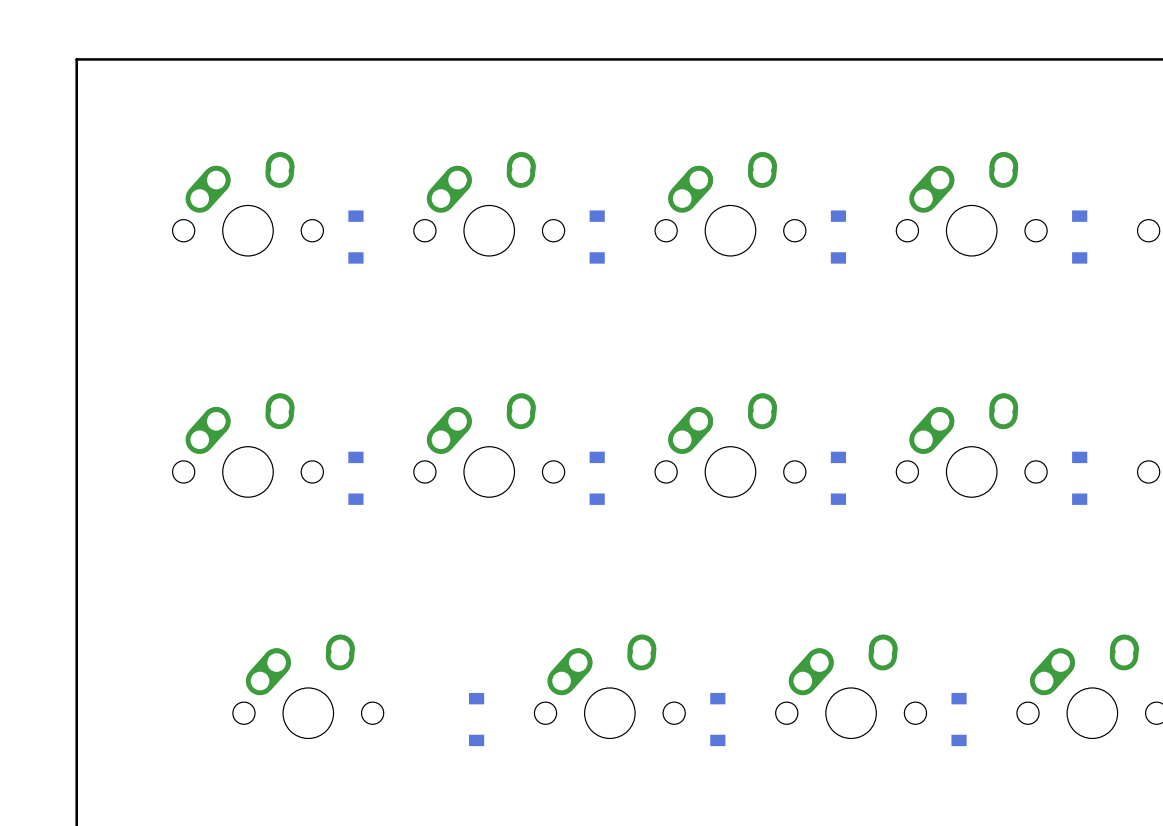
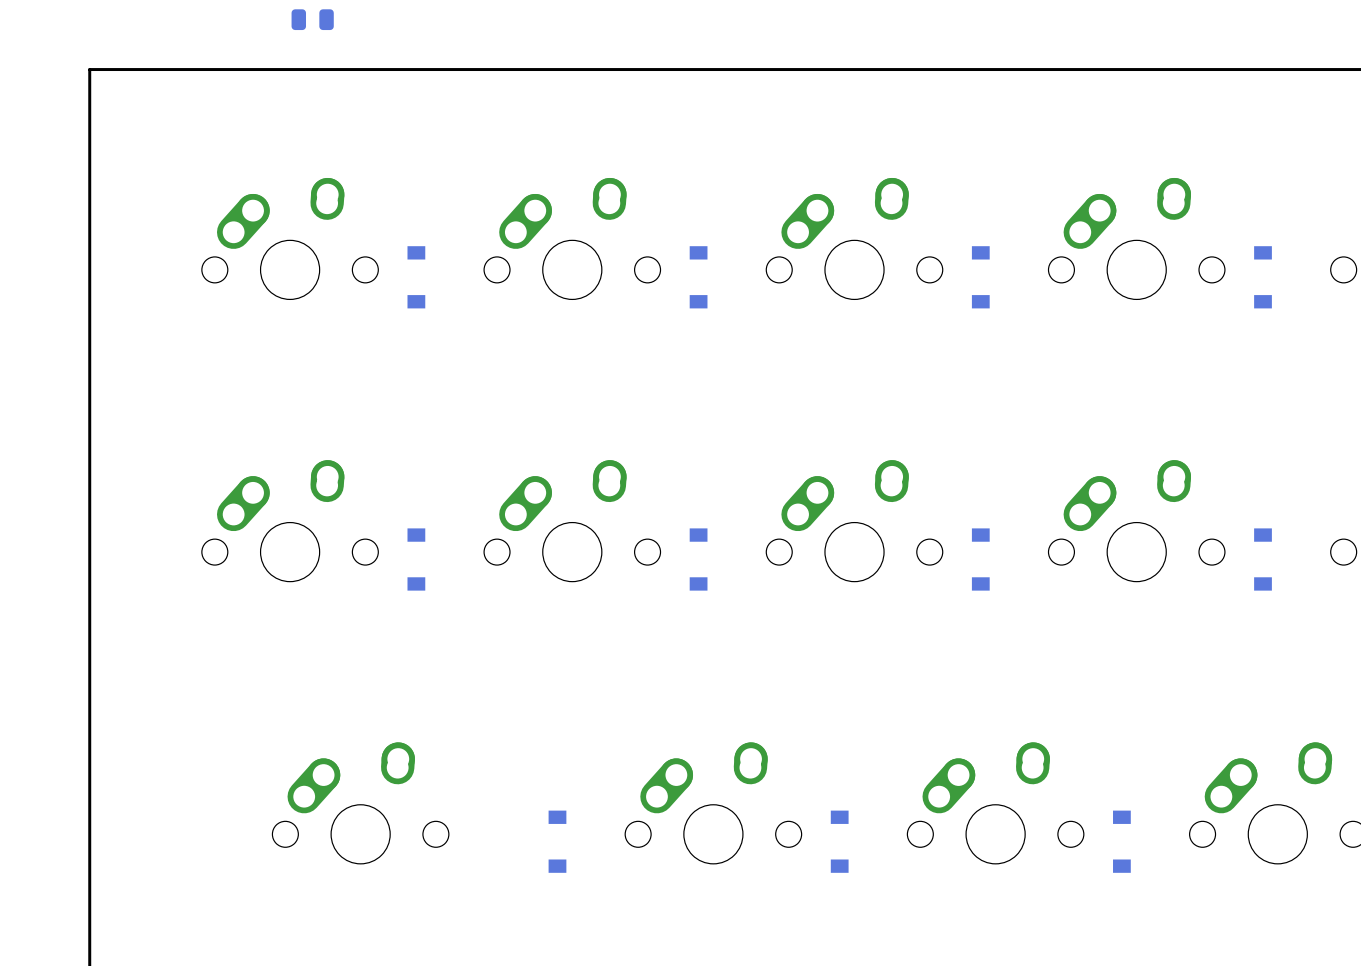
part: none -> (312, 19)

